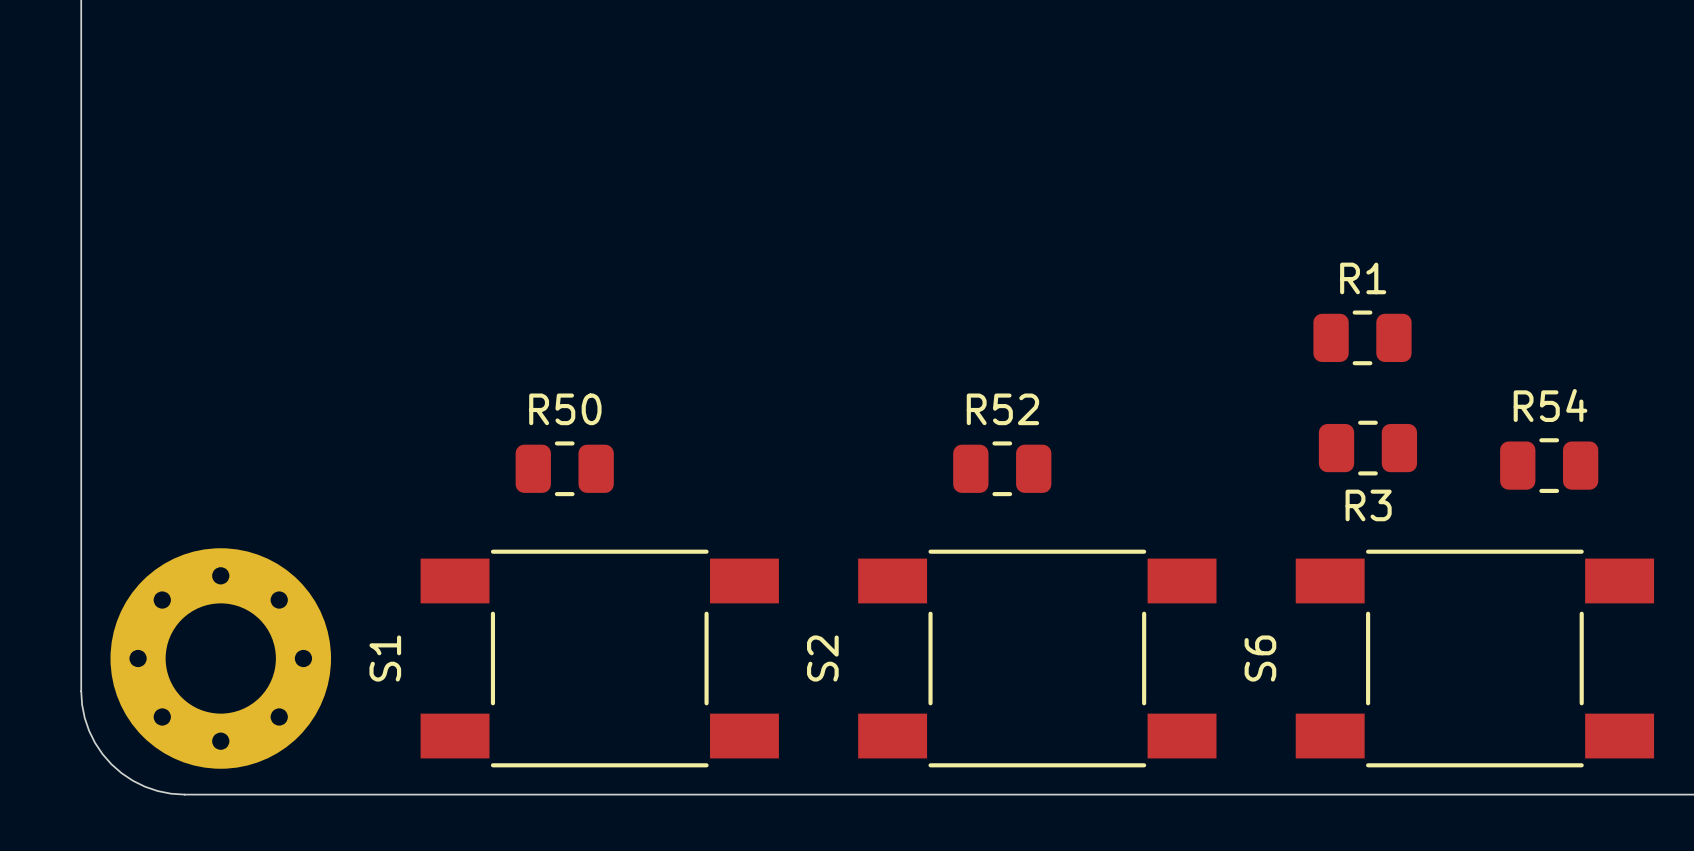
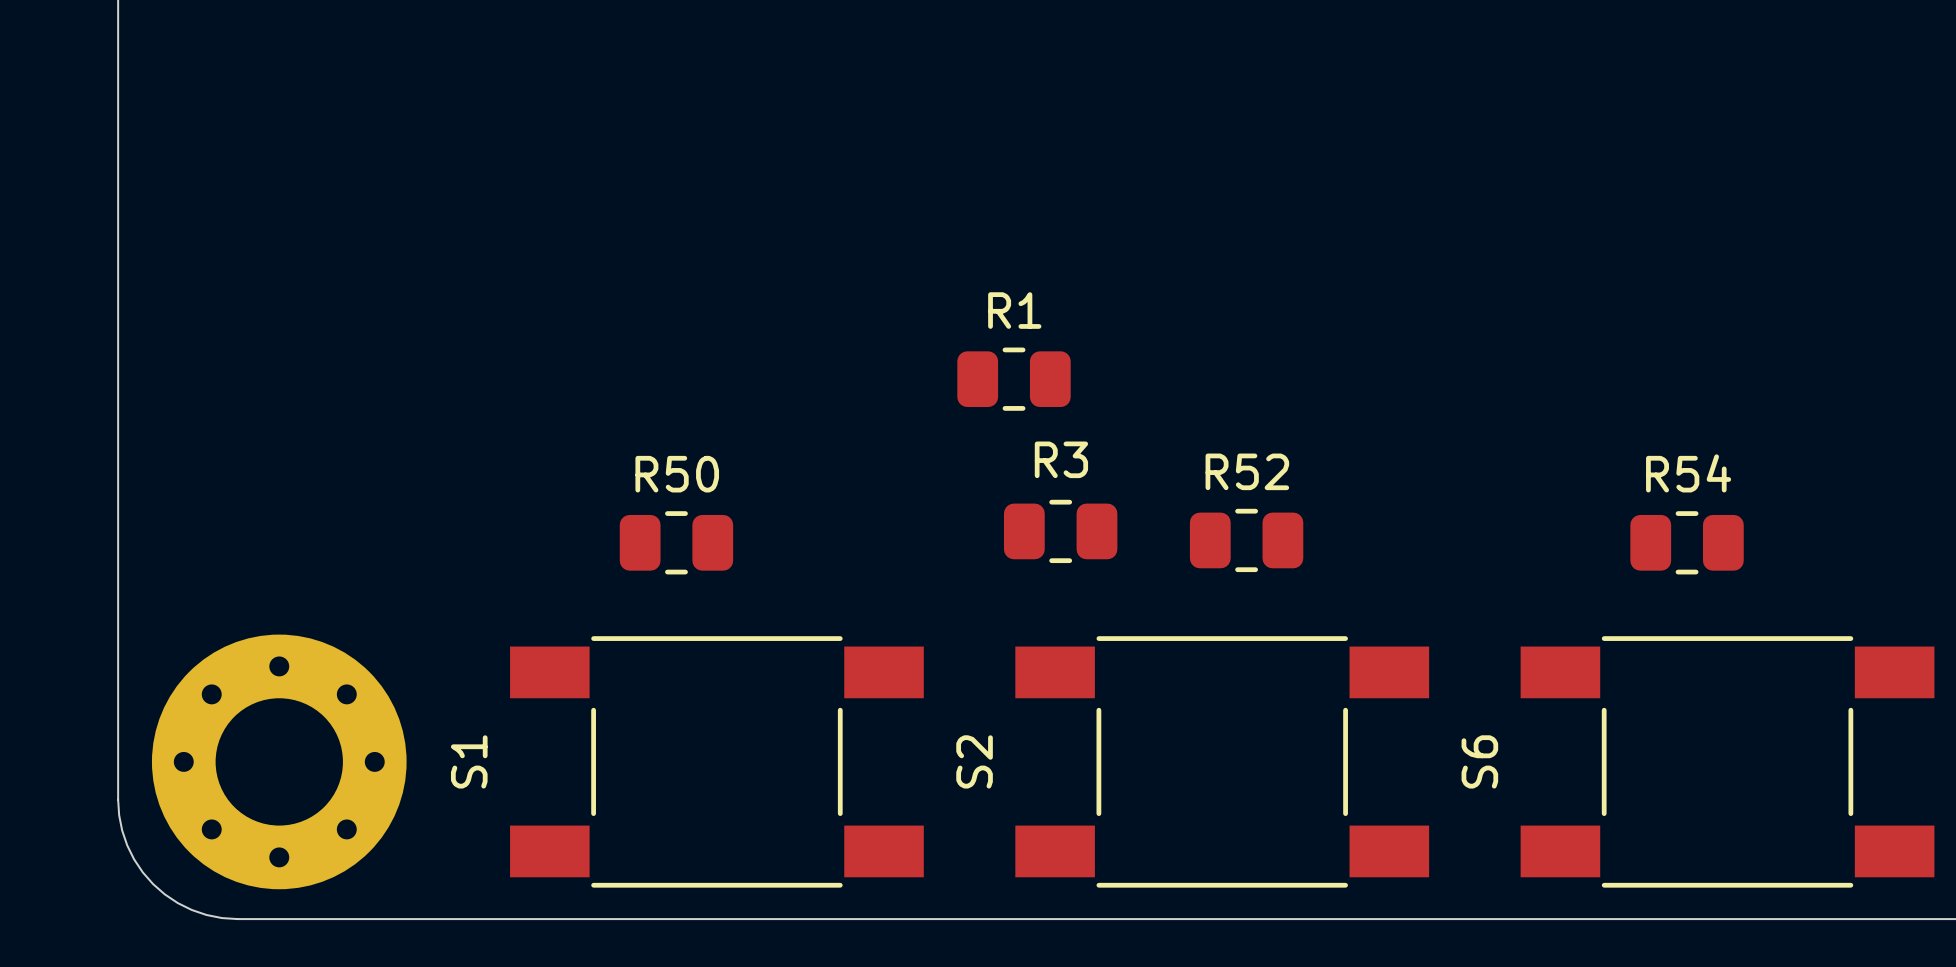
R1 position: (1362, 337) -> (1014, 379)
R3 position: (1367, 448) -> (1060, 531)
R54 position: (1549, 465) -> (1687, 542)
R52 position: (1002, 468) -> (1246, 540)
R3 name position: R3 (1368, 505) -> R3 (1061, 459)

